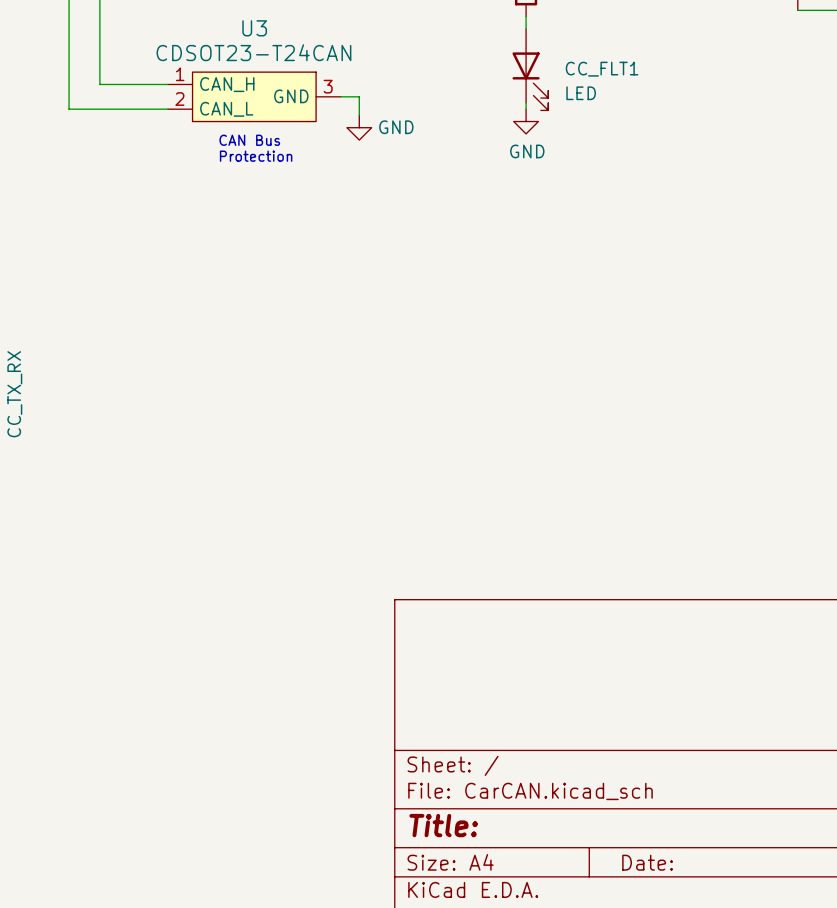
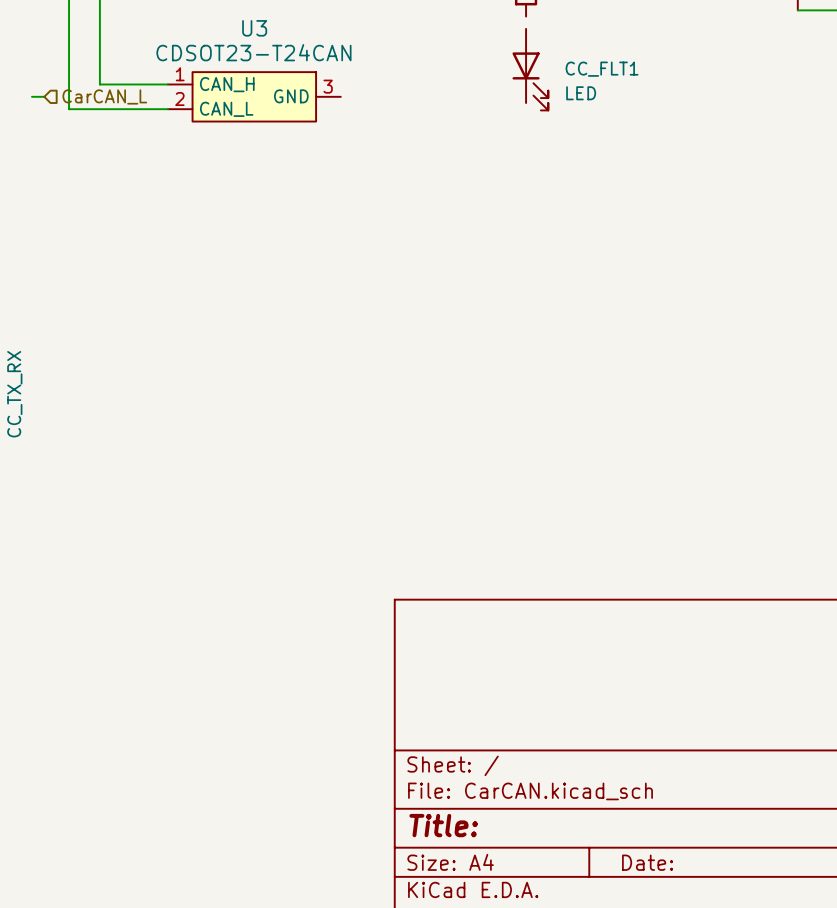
wire: (526, 16) (526, 28) -> none
wire: none -> (31, 96) (44, 96)
hierarchical label: none -> CarCAN_L (104, 96)
wire: (340, 96) (359, 96) (359, 115) -> none
wire: (526, 103) (526, 109) -> none
power symbol: GND (526, 121) -> none
power symbol: GND (359, 127) -> none
text: CAN Bus (249, 140) -> none
text: Protection (256, 156) -> none

